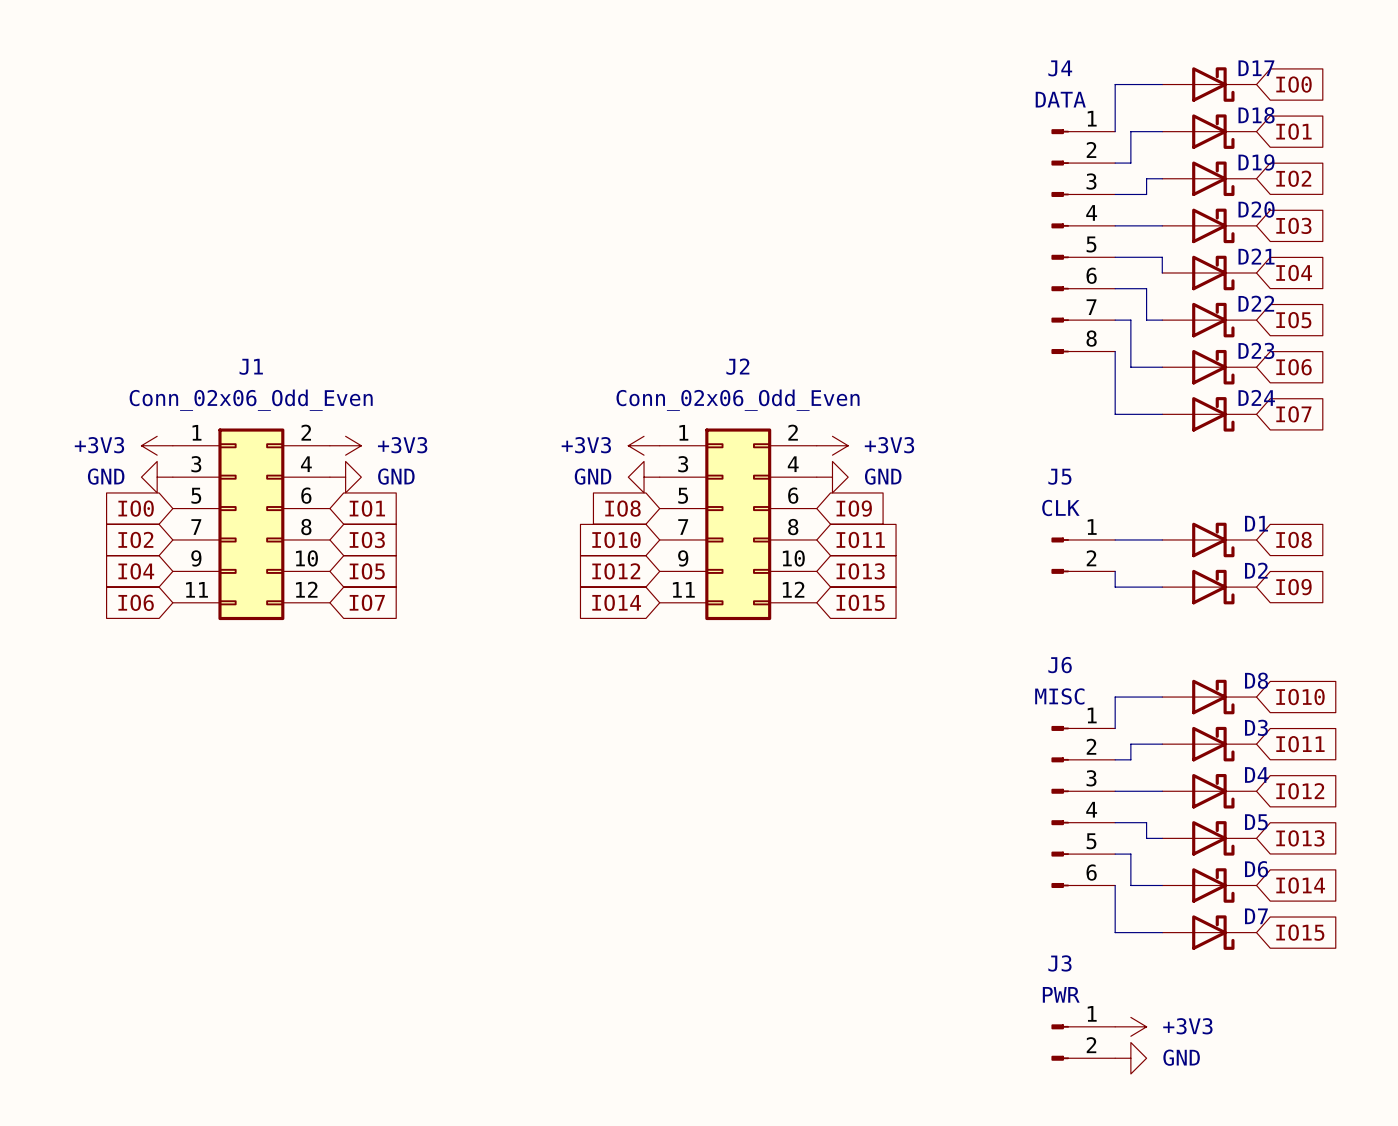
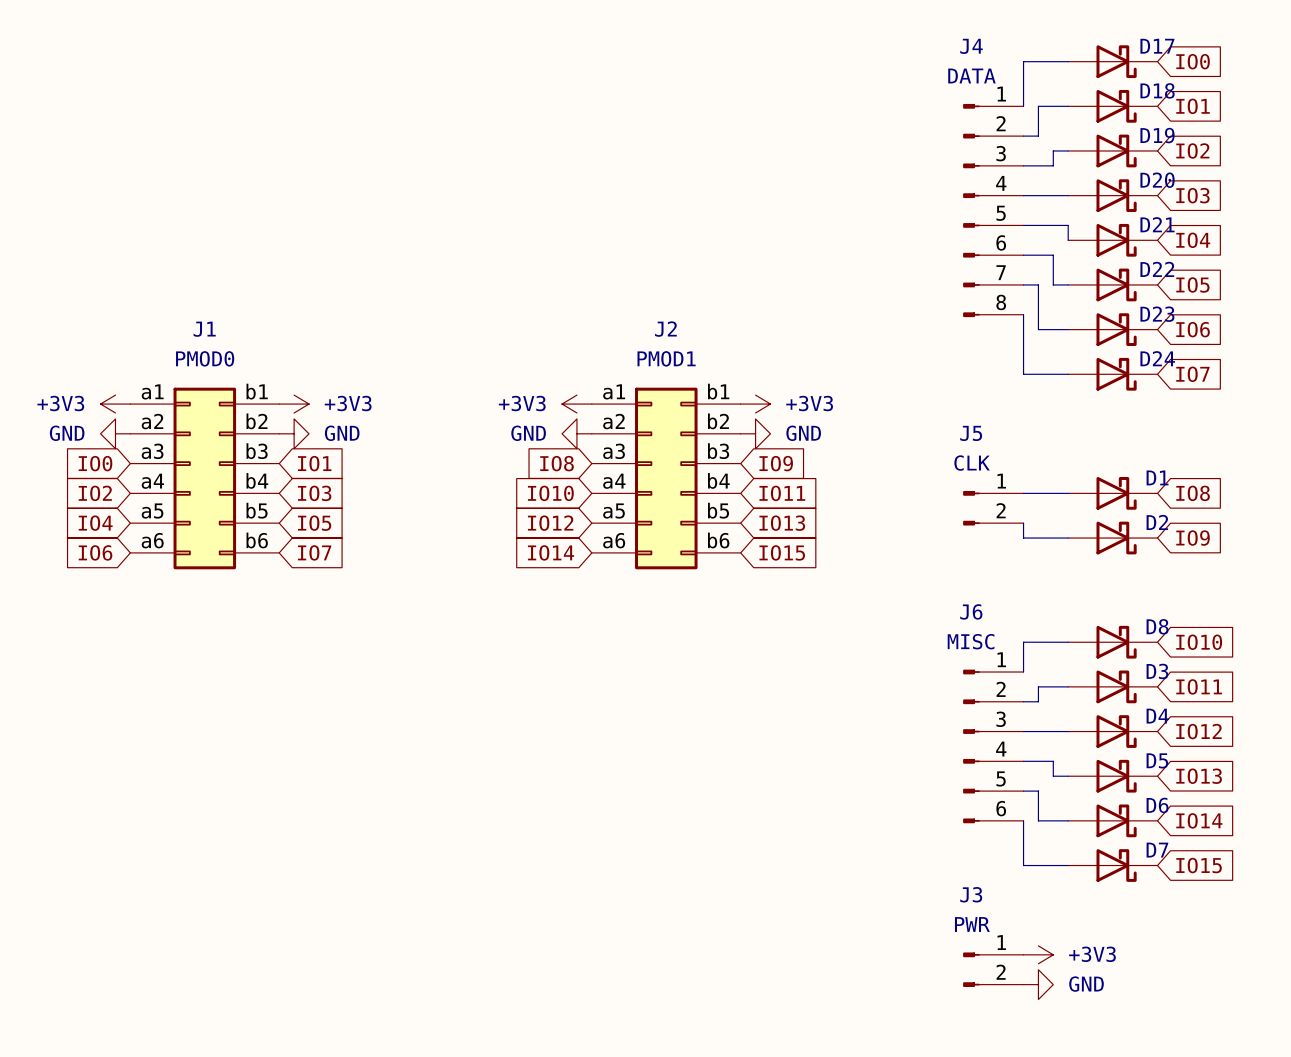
J1 value: Conn_02x06_Odd_Even (251, 400) -> PMOD0 (205, 358)
J2 value: Conn_02x06_Odd_Even (738, 400) -> PMOD1 (666, 358)
J1 symbol: [172, 428, 330, 621] -> [130, 387, 280, 570]
J2 symbol: [659, 428, 817, 621] -> [591, 387, 741, 570]

